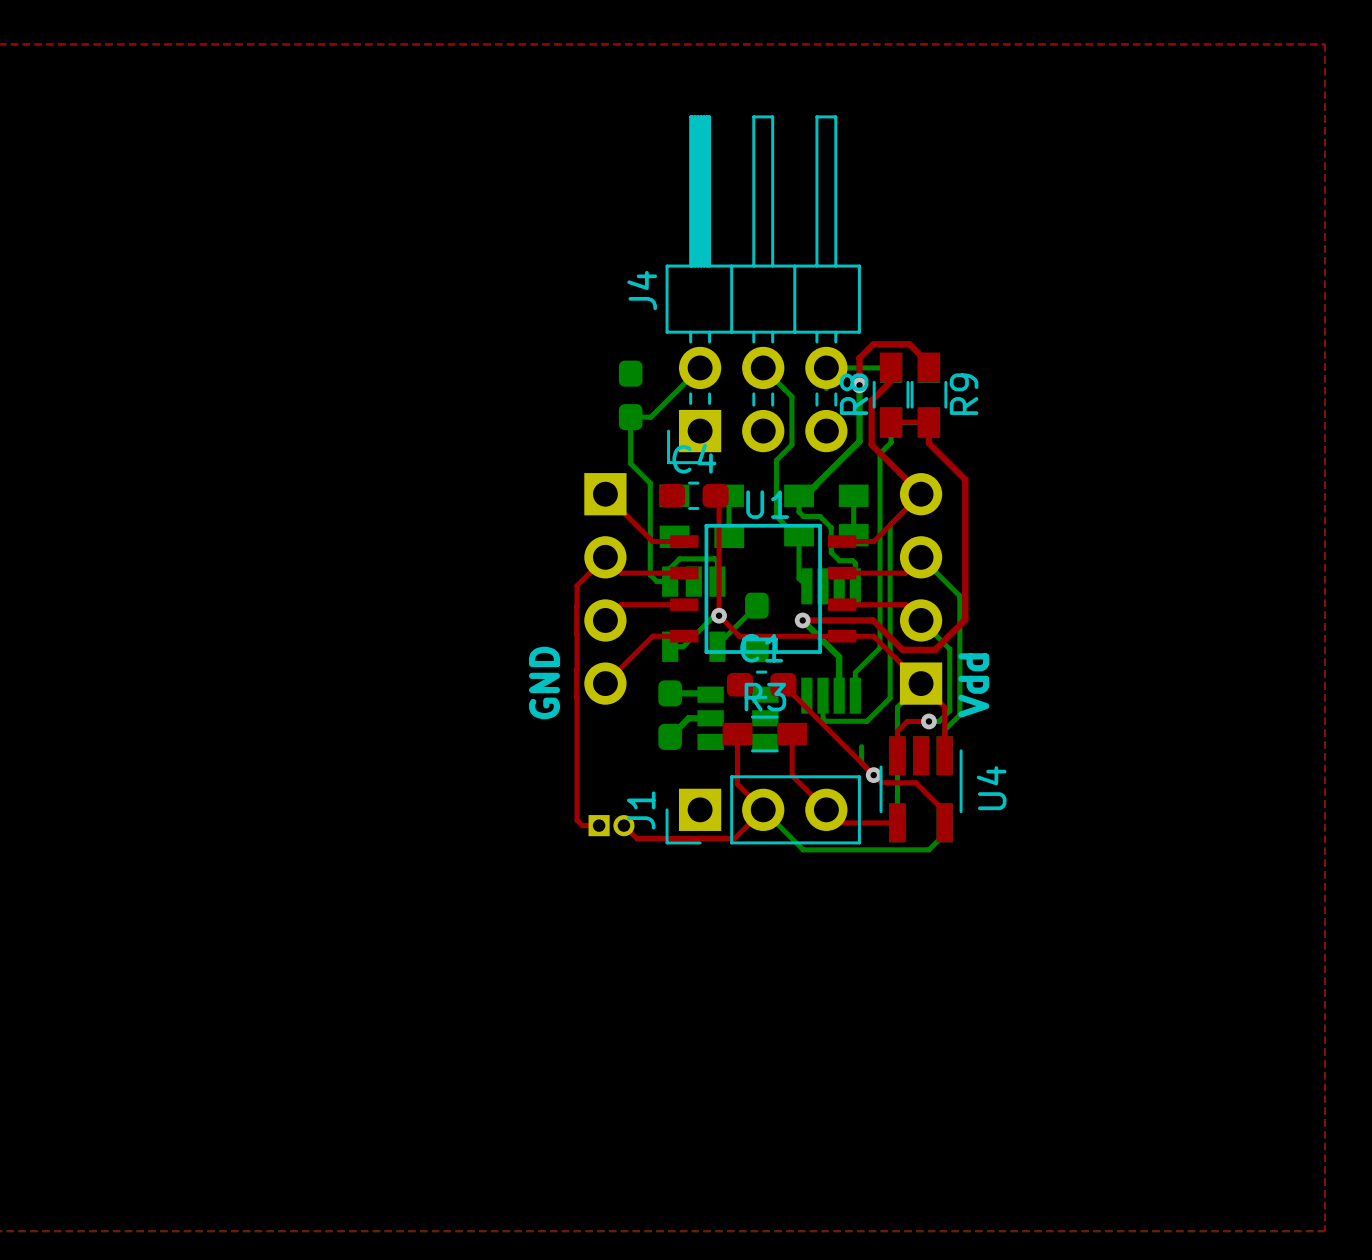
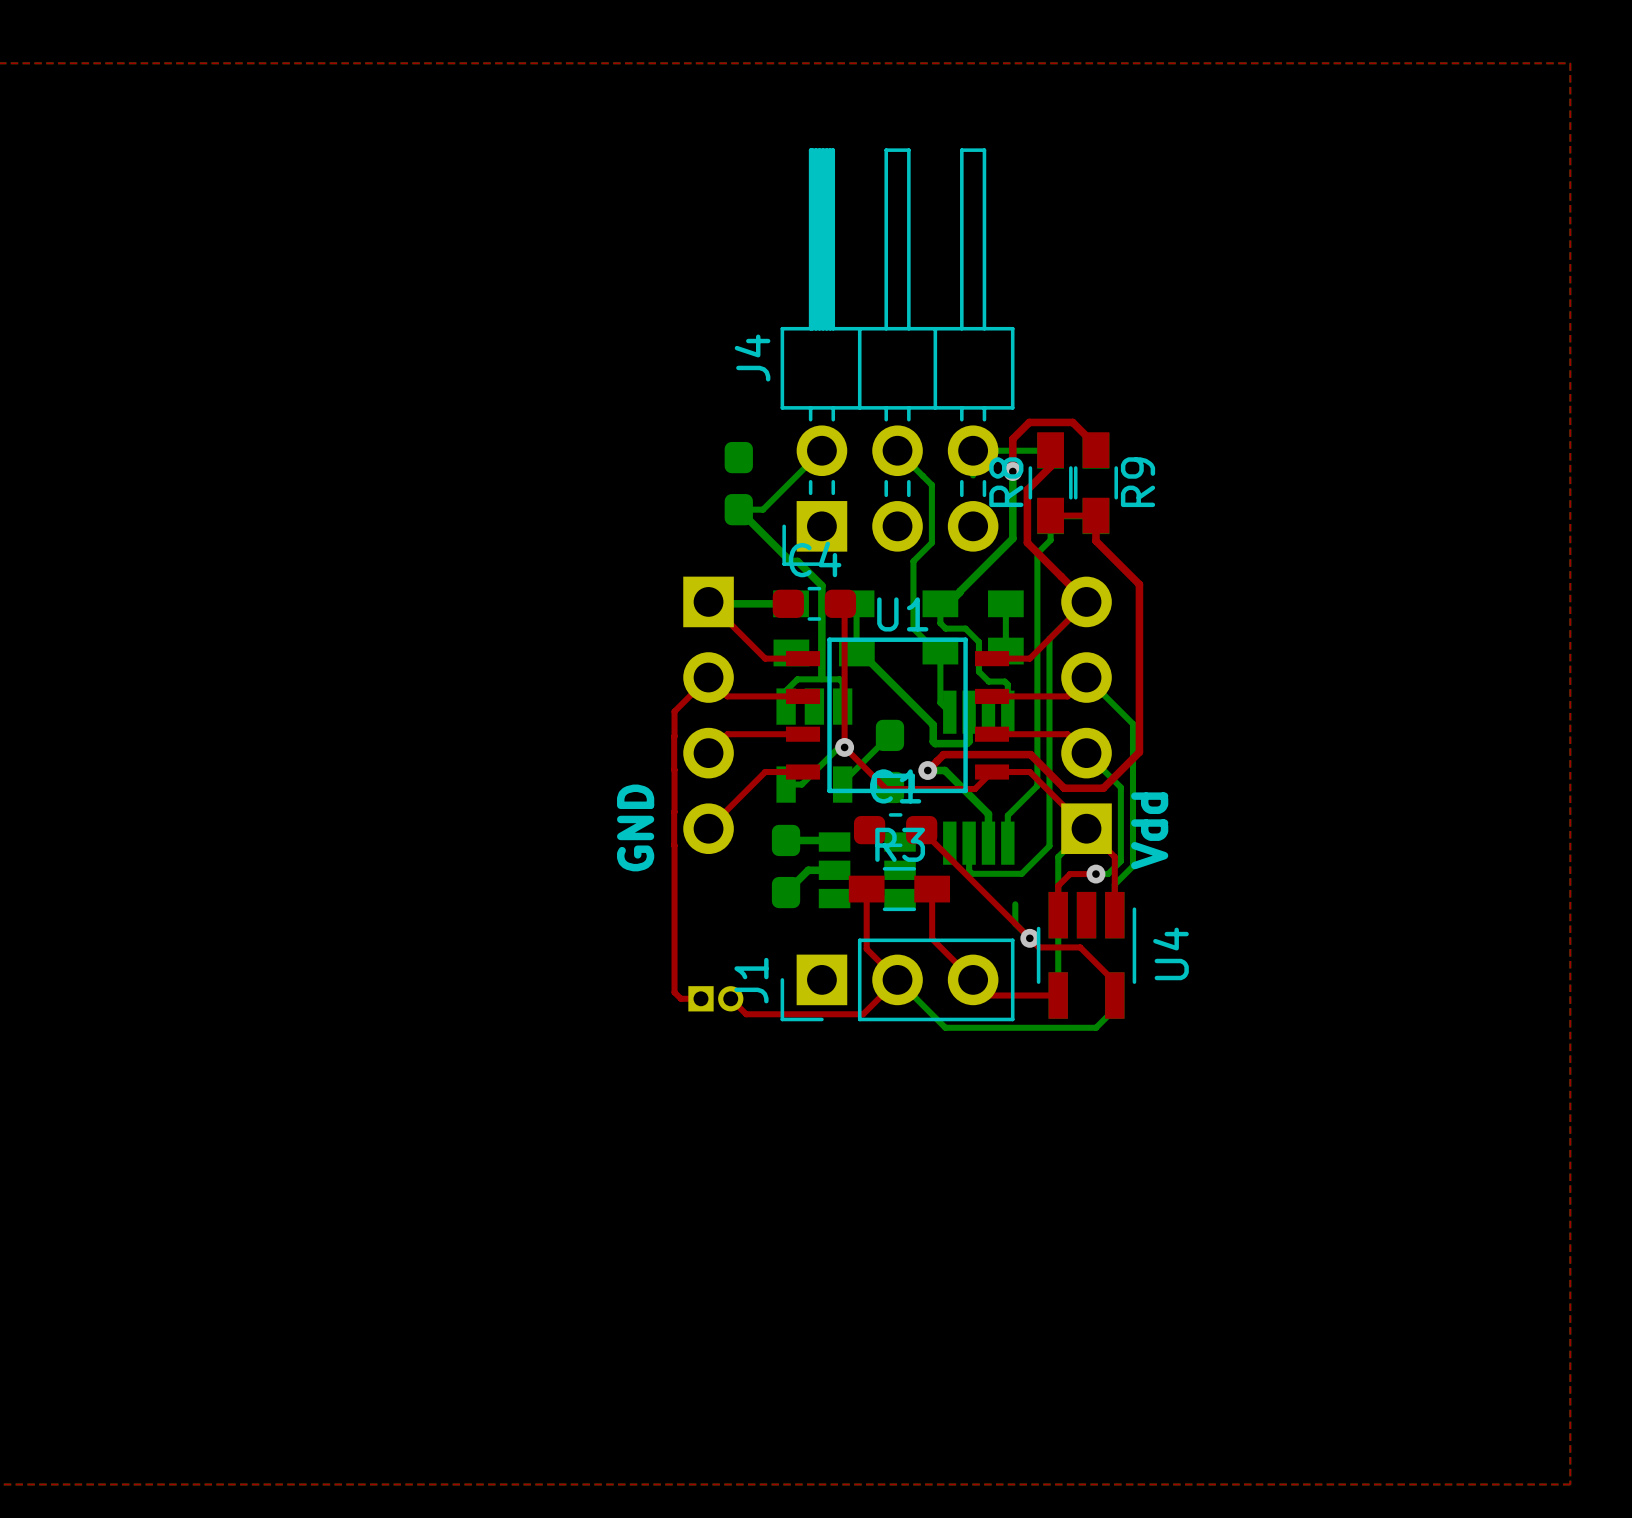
bottom track: (630, 417) (630, 463) (650, 483) (650, 574) (657, 581) (670, 581) -> (738, 509) (790, 561) (797, 561) (821, 585) (821, 678)
bottom track: none -> (708, 601) (710, 603) (791, 603)
bottom track: none -> (856, 652) (861, 652) (933, 724) (933, 741) (935, 743) (966, 743) (969, 741) (969, 712)
top track: (802, 620) (874, 621) -> (927, 770) (943, 754) (1030, 754)
bottom track: (802, 620) (839, 656) (839, 671) -> (927, 770) (944, 770) (988, 814)
via position: (802, 620) -> (927, 770)
top track: (739, 636) (842, 636) -> (869, 772) (886, 789) (975, 789) (992, 772)

